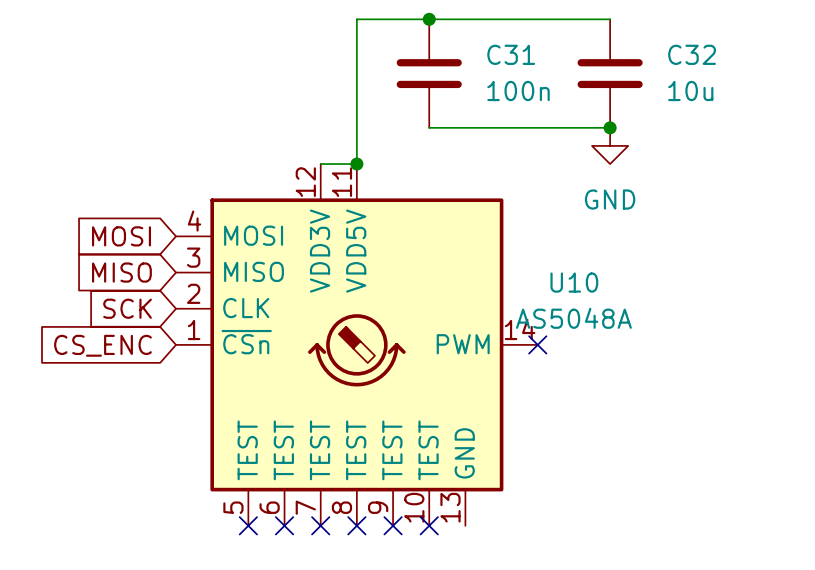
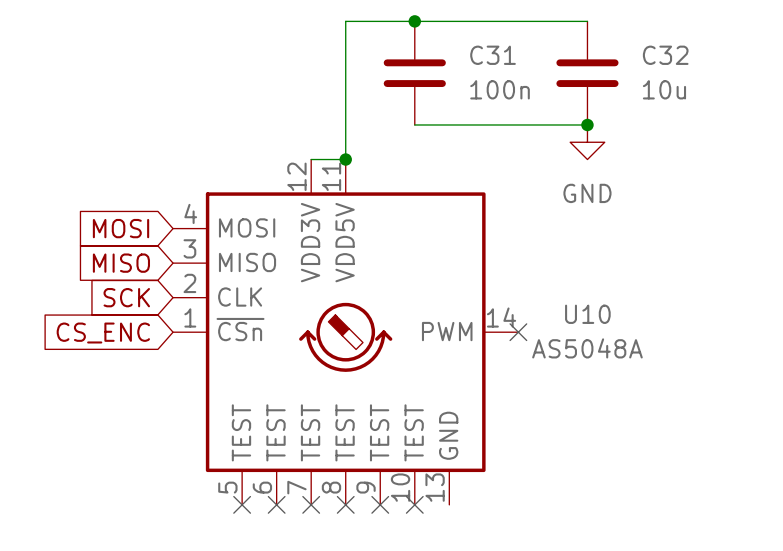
U10 name position: U10 (574, 282) -> U10 (587, 314)
U10 value position: AS5048A (573, 318) -> AS5048A (587, 348)

